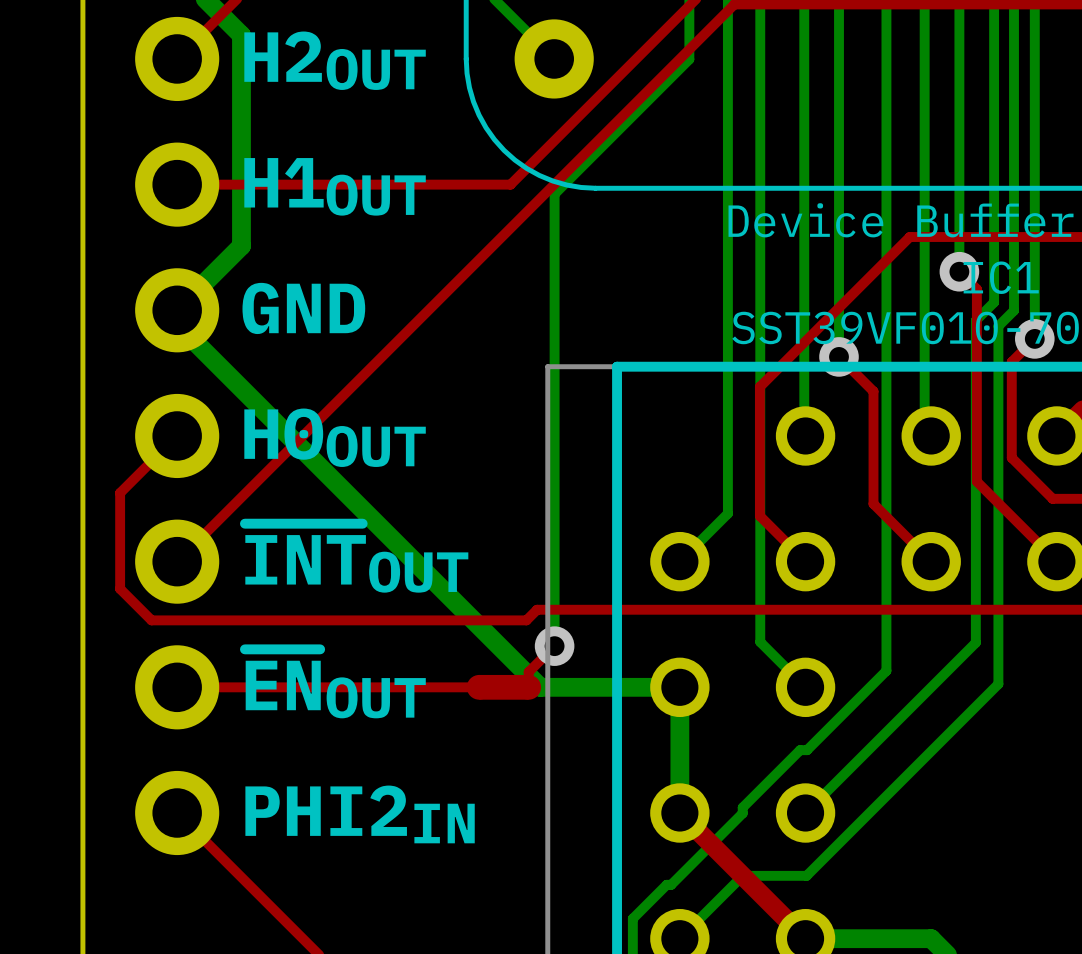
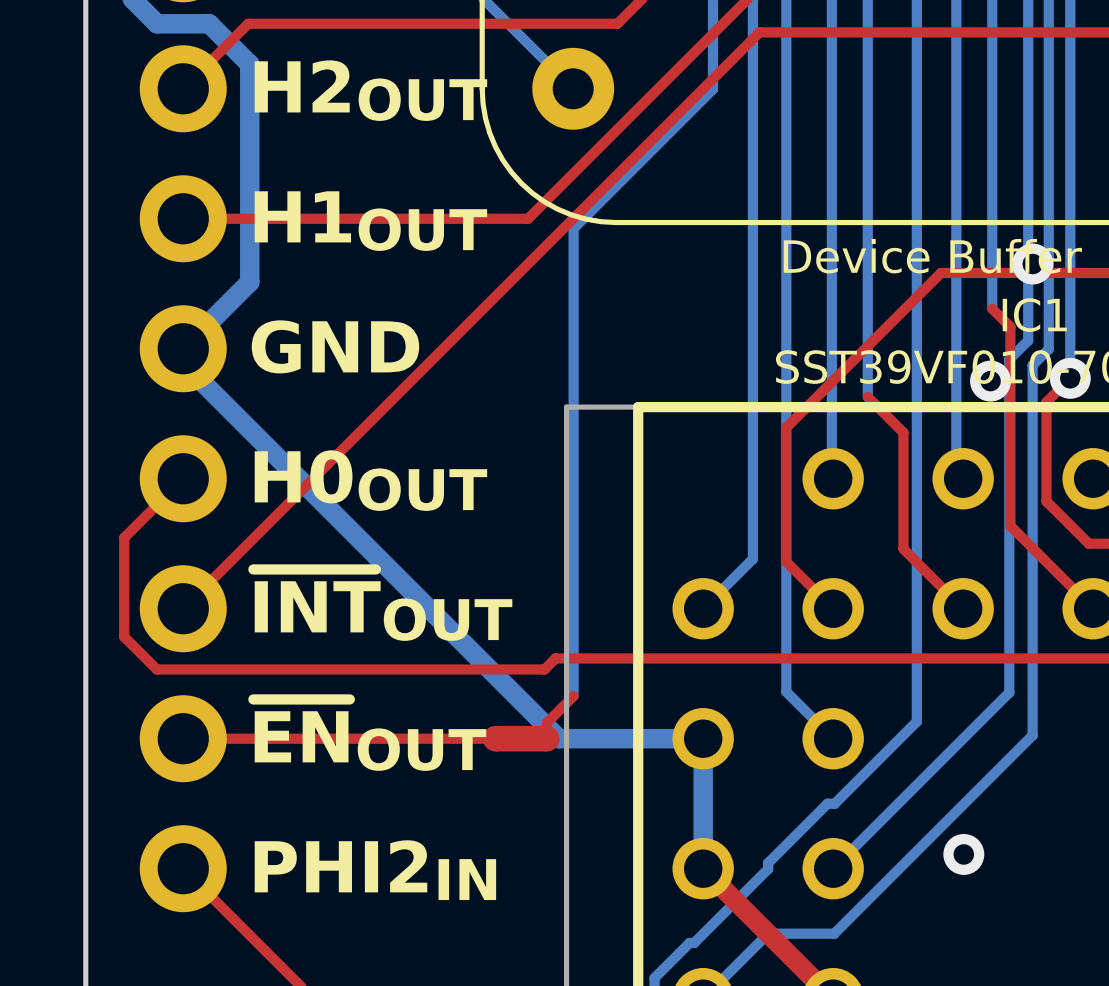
via: none -> (1032, 264)
via: (959, 271) -> none
via: none -> (990, 381)
via: (839, 356) -> none
via: (554, 646) -> none
via: none -> (963, 854)

